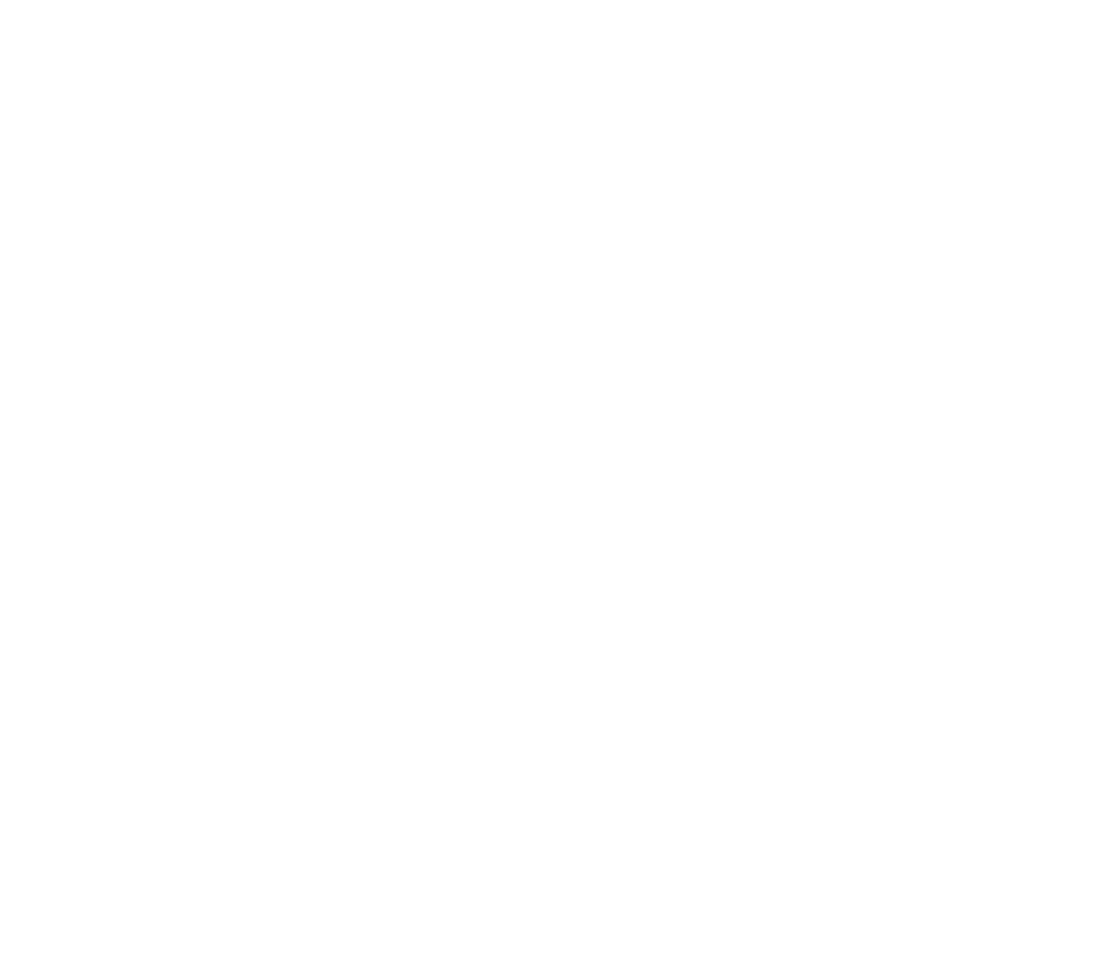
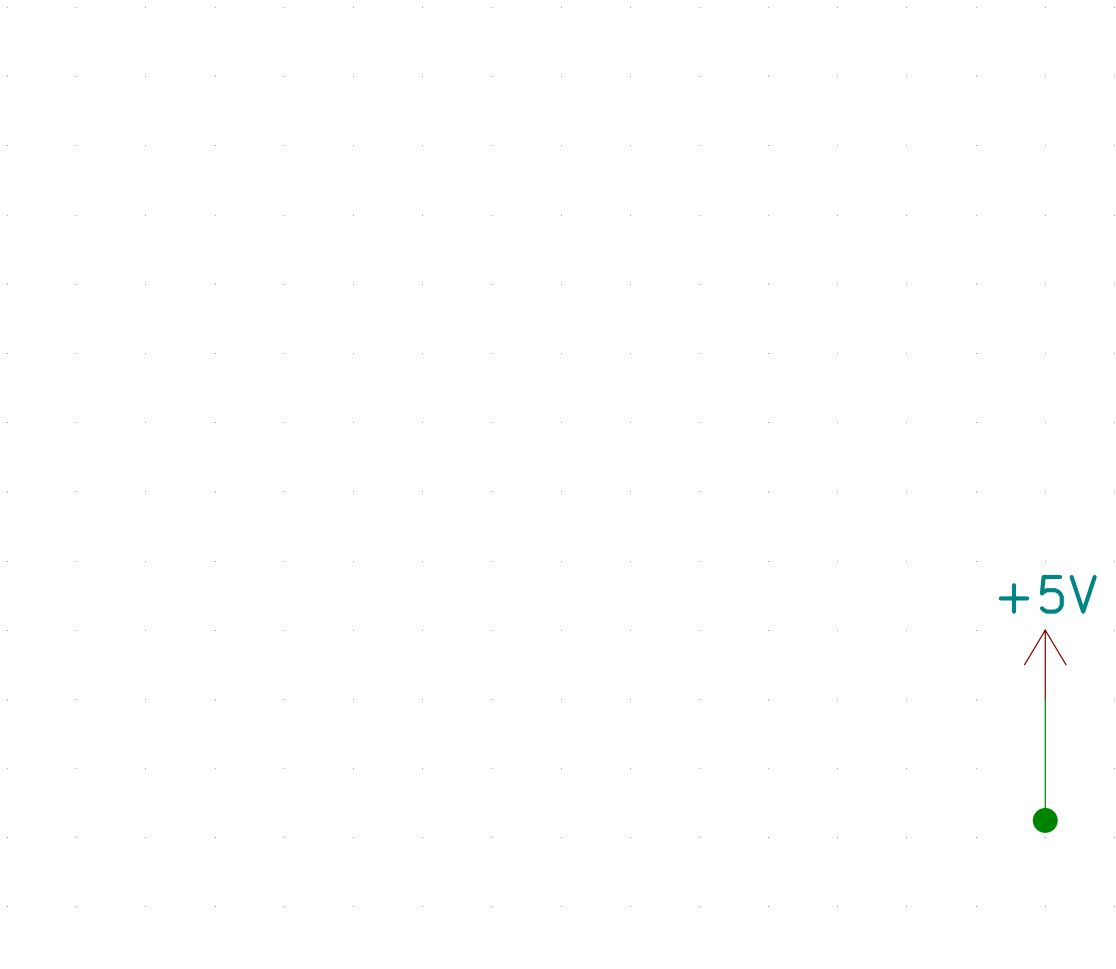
power symbol: none -> +5V (1045, 664)
wire: none -> (1045, 699) (1045, 820)
junction: none -> (1045, 820)

